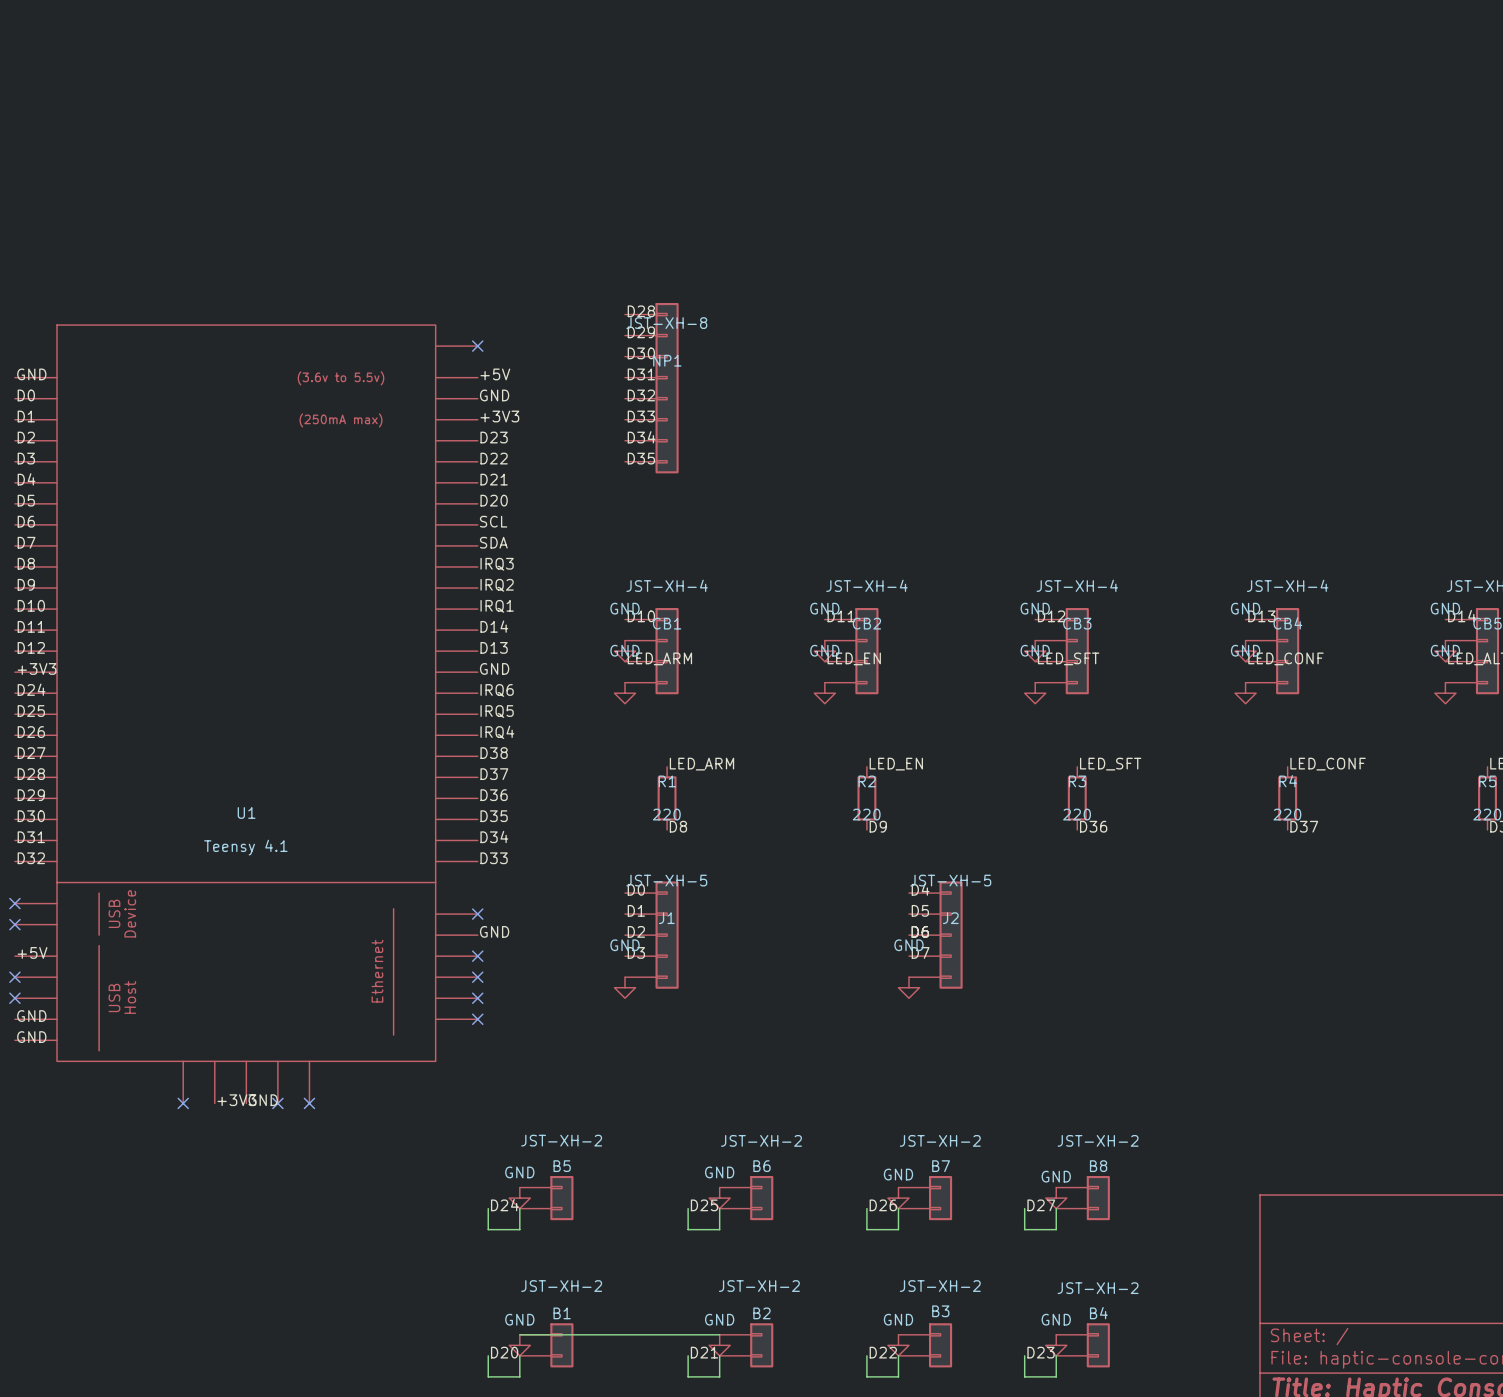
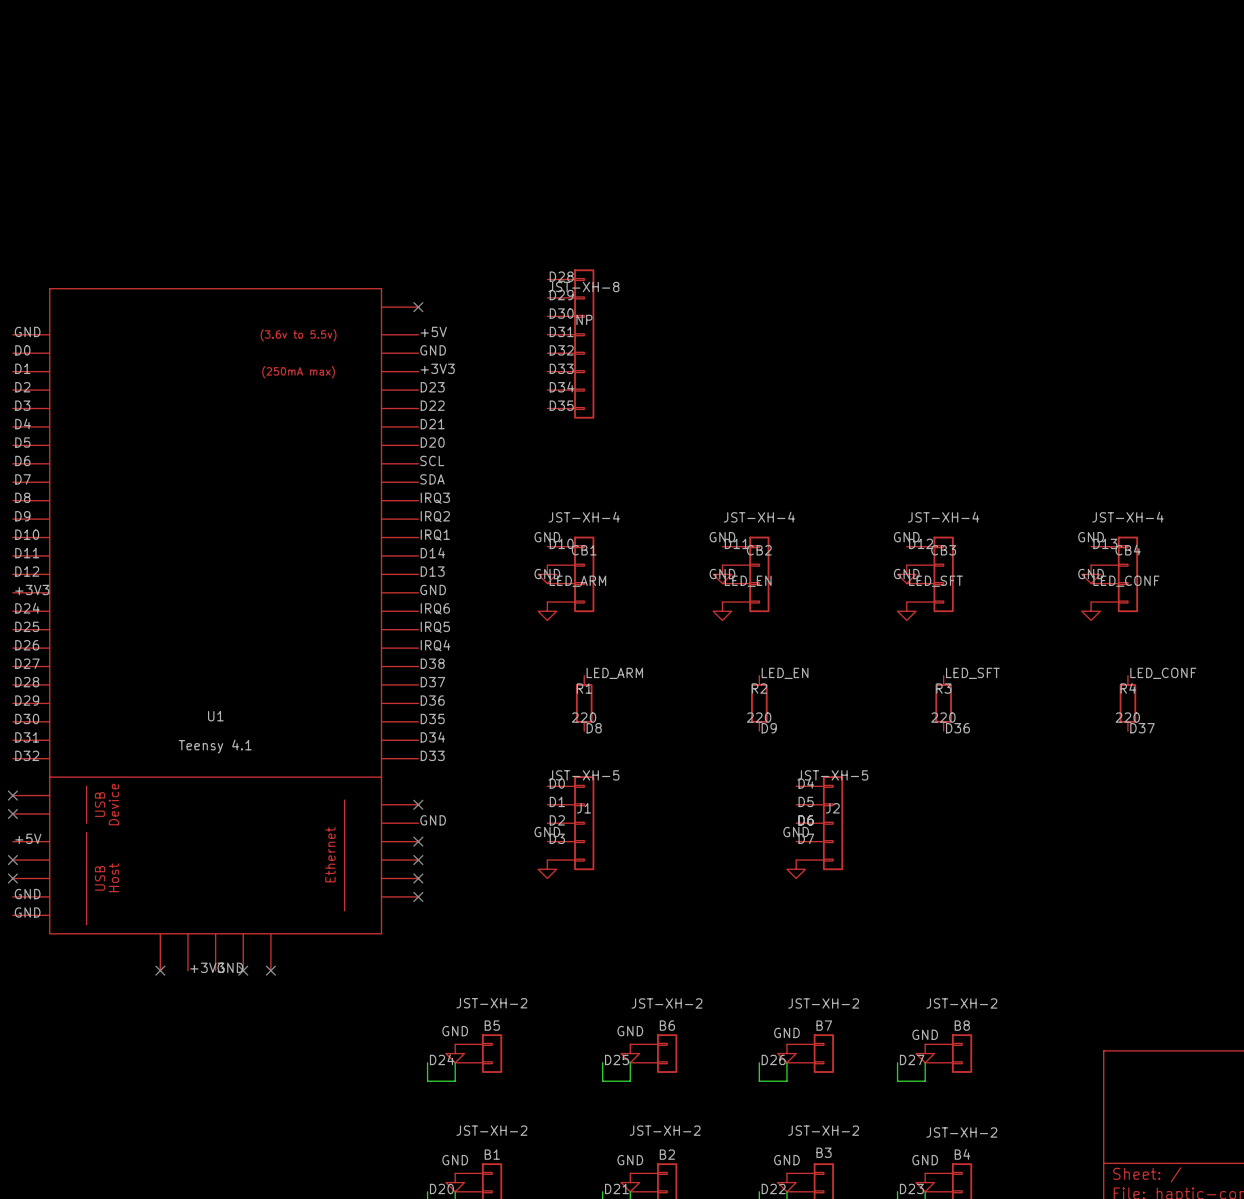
NP1 name: NP1 (667, 360) -> NP (584, 319)
wire: (519, 1334) (719, 1334) -> none

